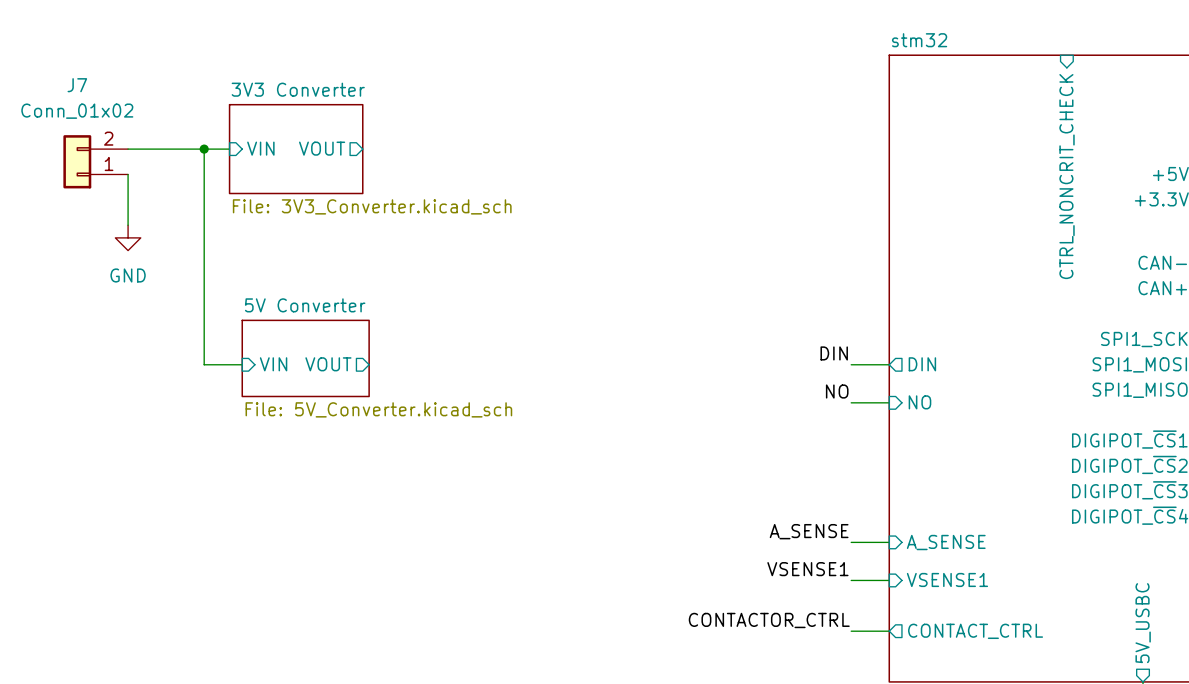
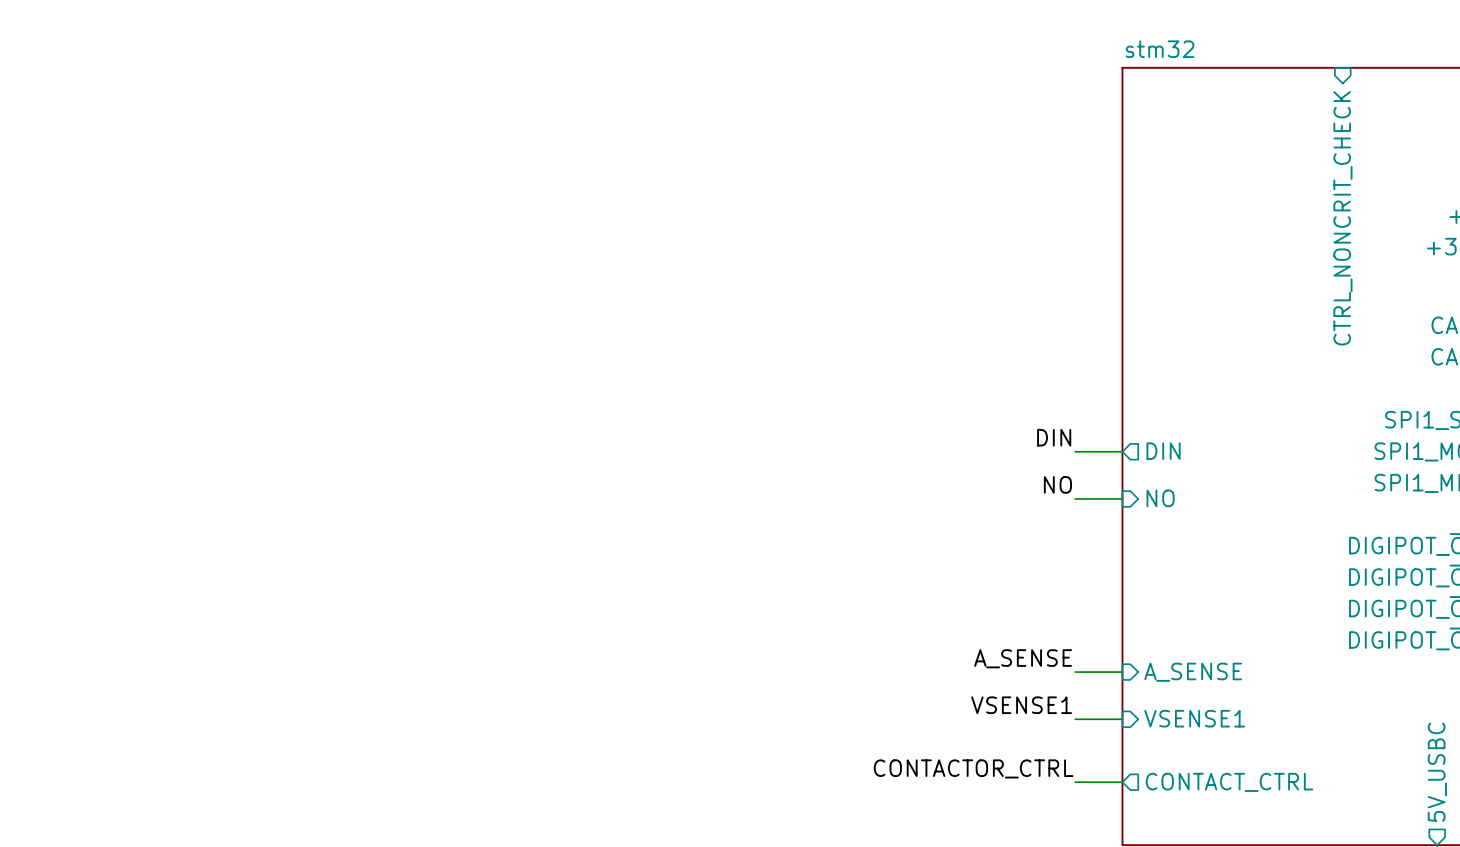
sheet pin: VIN (260, 148) -> none
sheet pin: VOUT (322, 148) -> none
wire: (128, 149) (229, 149) -> none
wire: (204, 149) (204, 364) (242, 364) -> none
junction: (204, 149) -> none
sheet 3V3 Converter: File: 3V3_Converter.kicad_sch (296, 149) -> none
J7: Conn_01x02 (95, 161) -> none
wire: (128, 174) (128, 225) -> none
power symbol: GND (128, 237) -> none
sheet 5V Converter: File: 5V_Converter.kicad_sch (305, 358) -> none
sheet pin: VIN (273, 364) -> none
sheet pin: VOUT (328, 364) -> none

